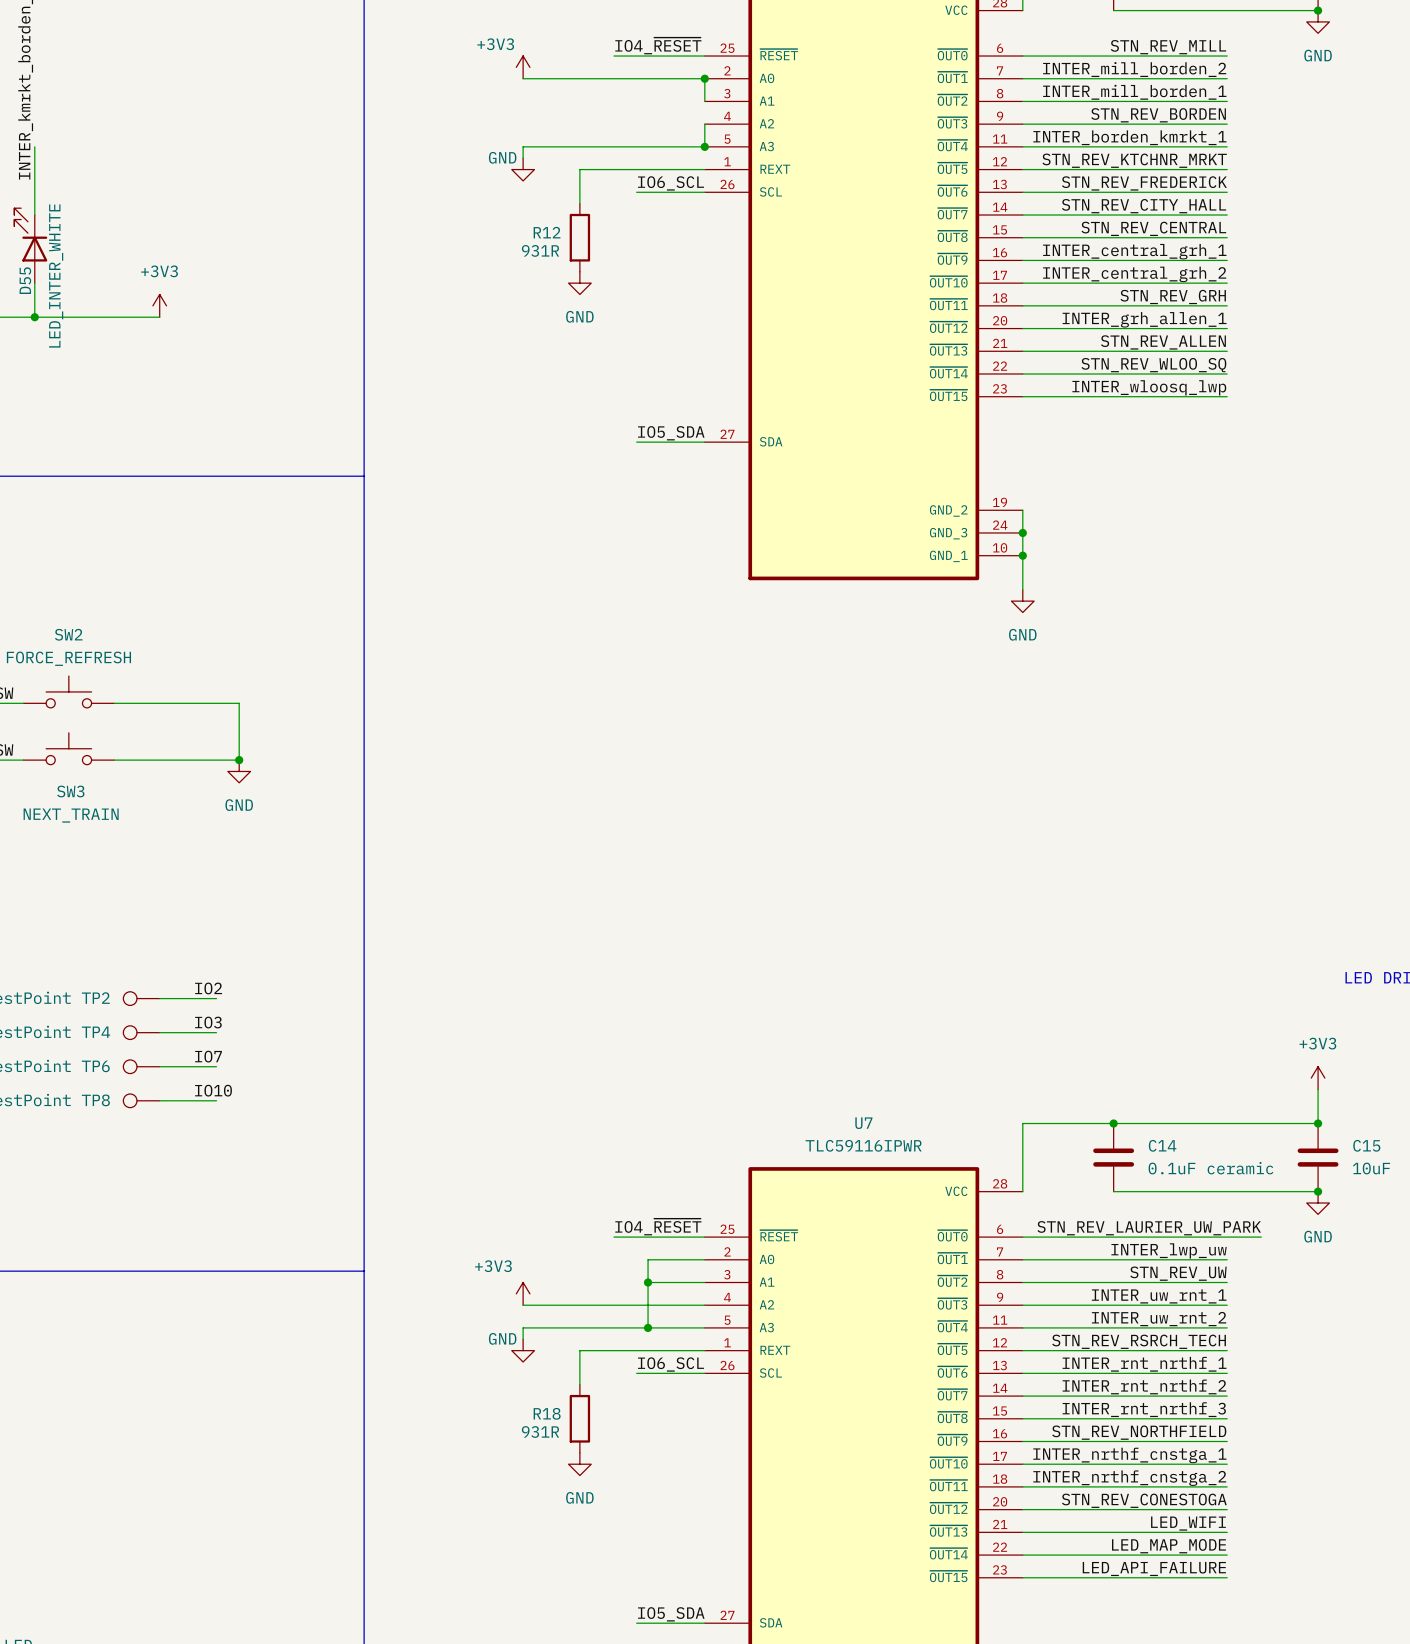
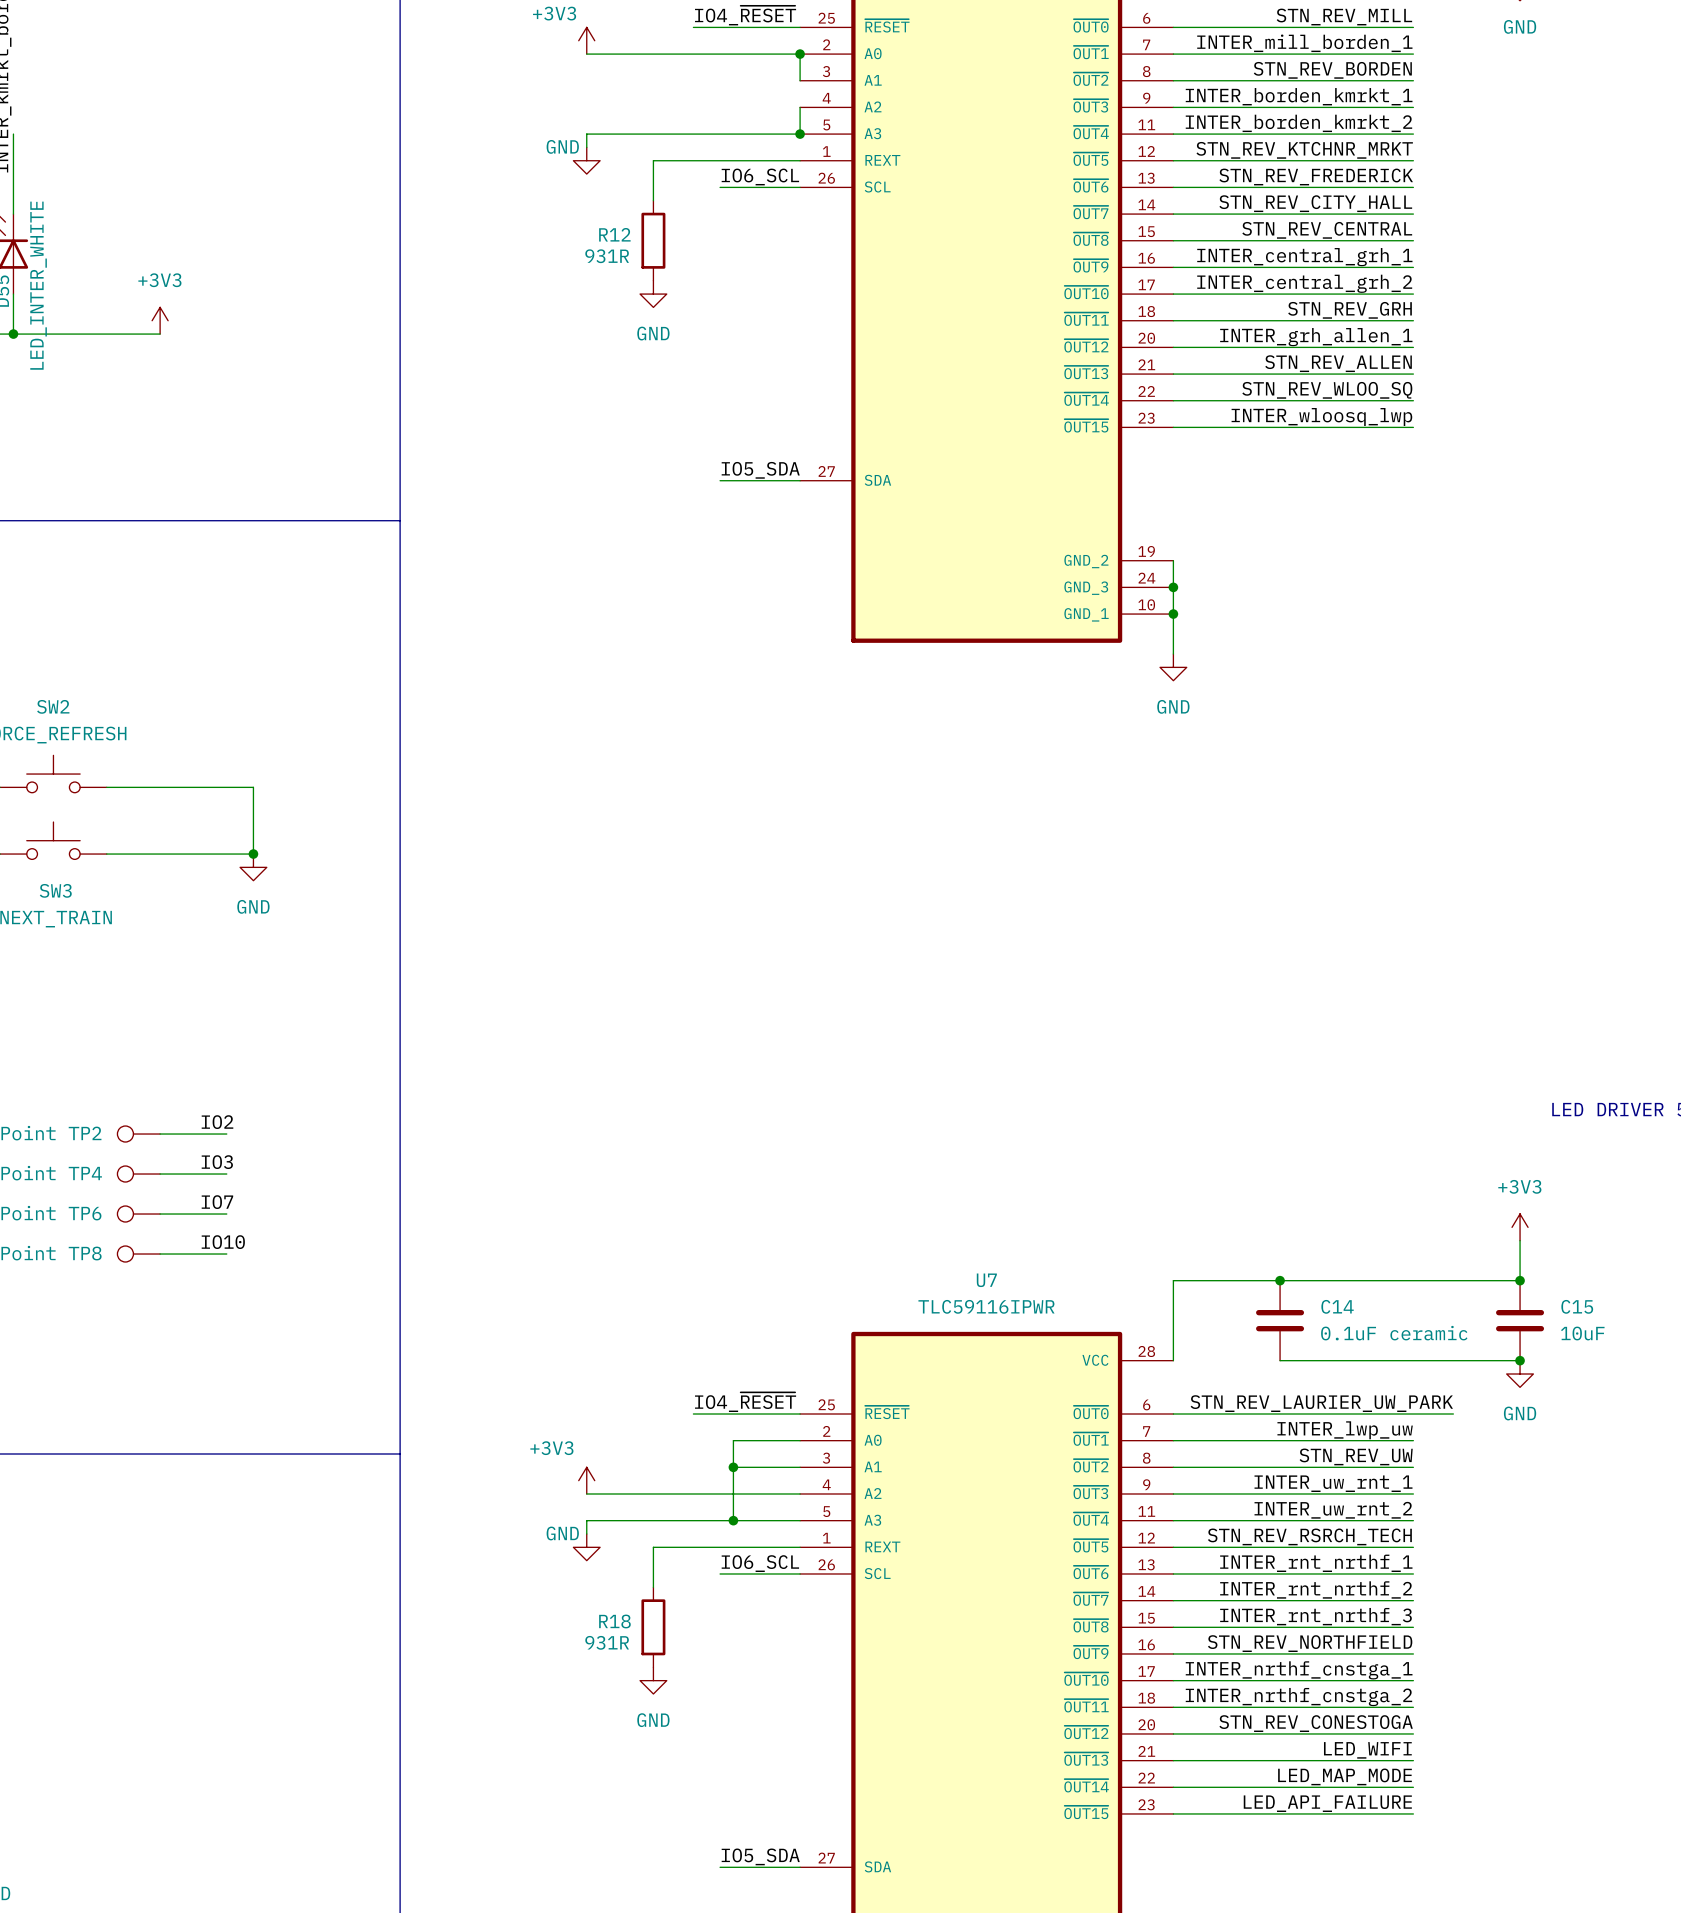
label: INTER_mill_borden_2 (1134, 69) -> INTER_mill_borden_1 (1304, 43)
label: INTER_mill_borden_1 (1134, 92) -> STN_REV_BORDEN (1332, 70)
label: STN_REV_BORDEN (1158, 115) -> INTER_borden_kmrkt_1 (1299, 96)
label: INTER_borden_kmrkt_1 (1129, 137) -> INTER_borden_kmrkt_2 (1298, 123)

